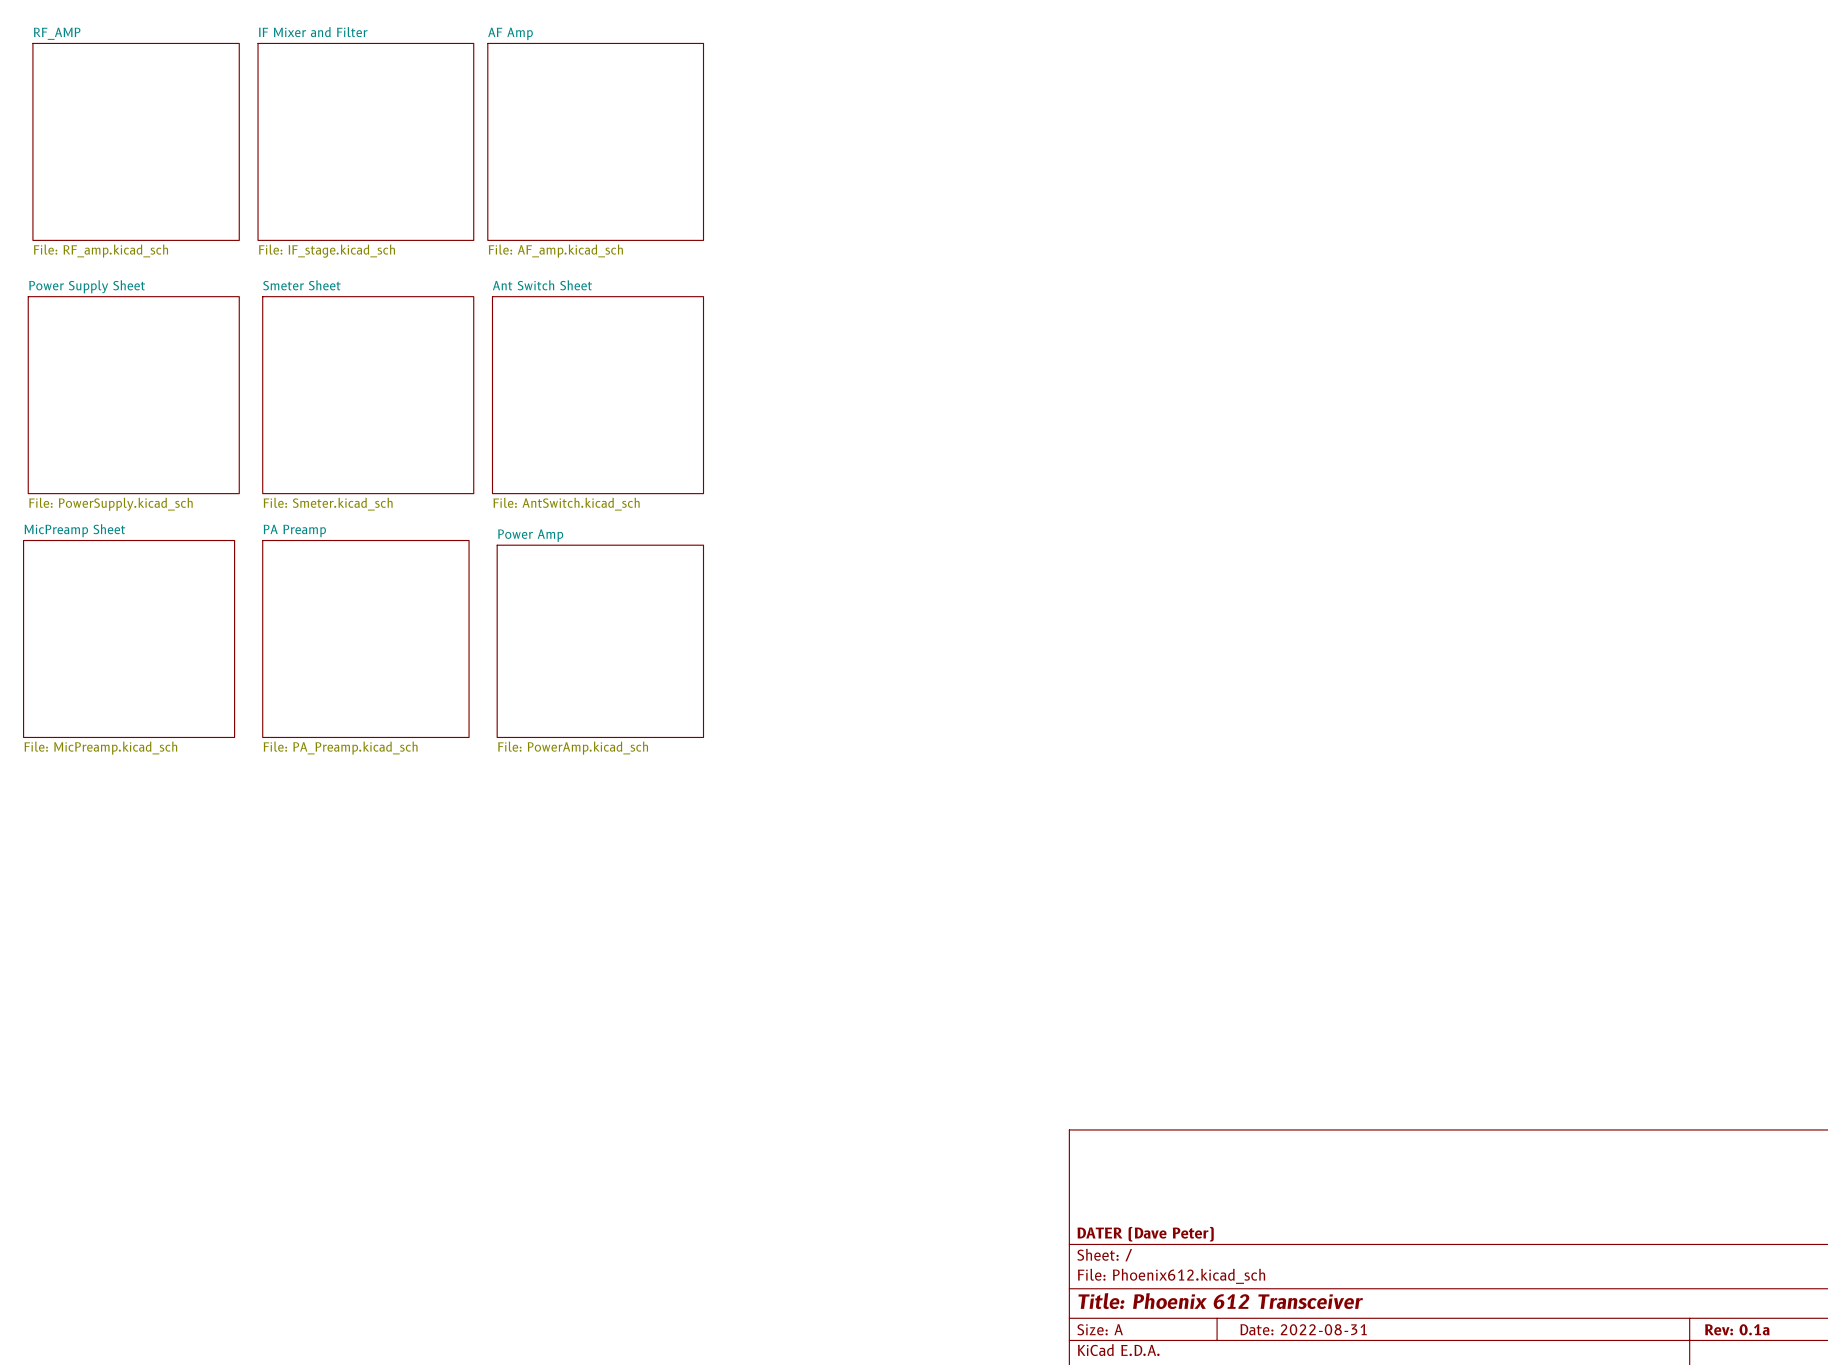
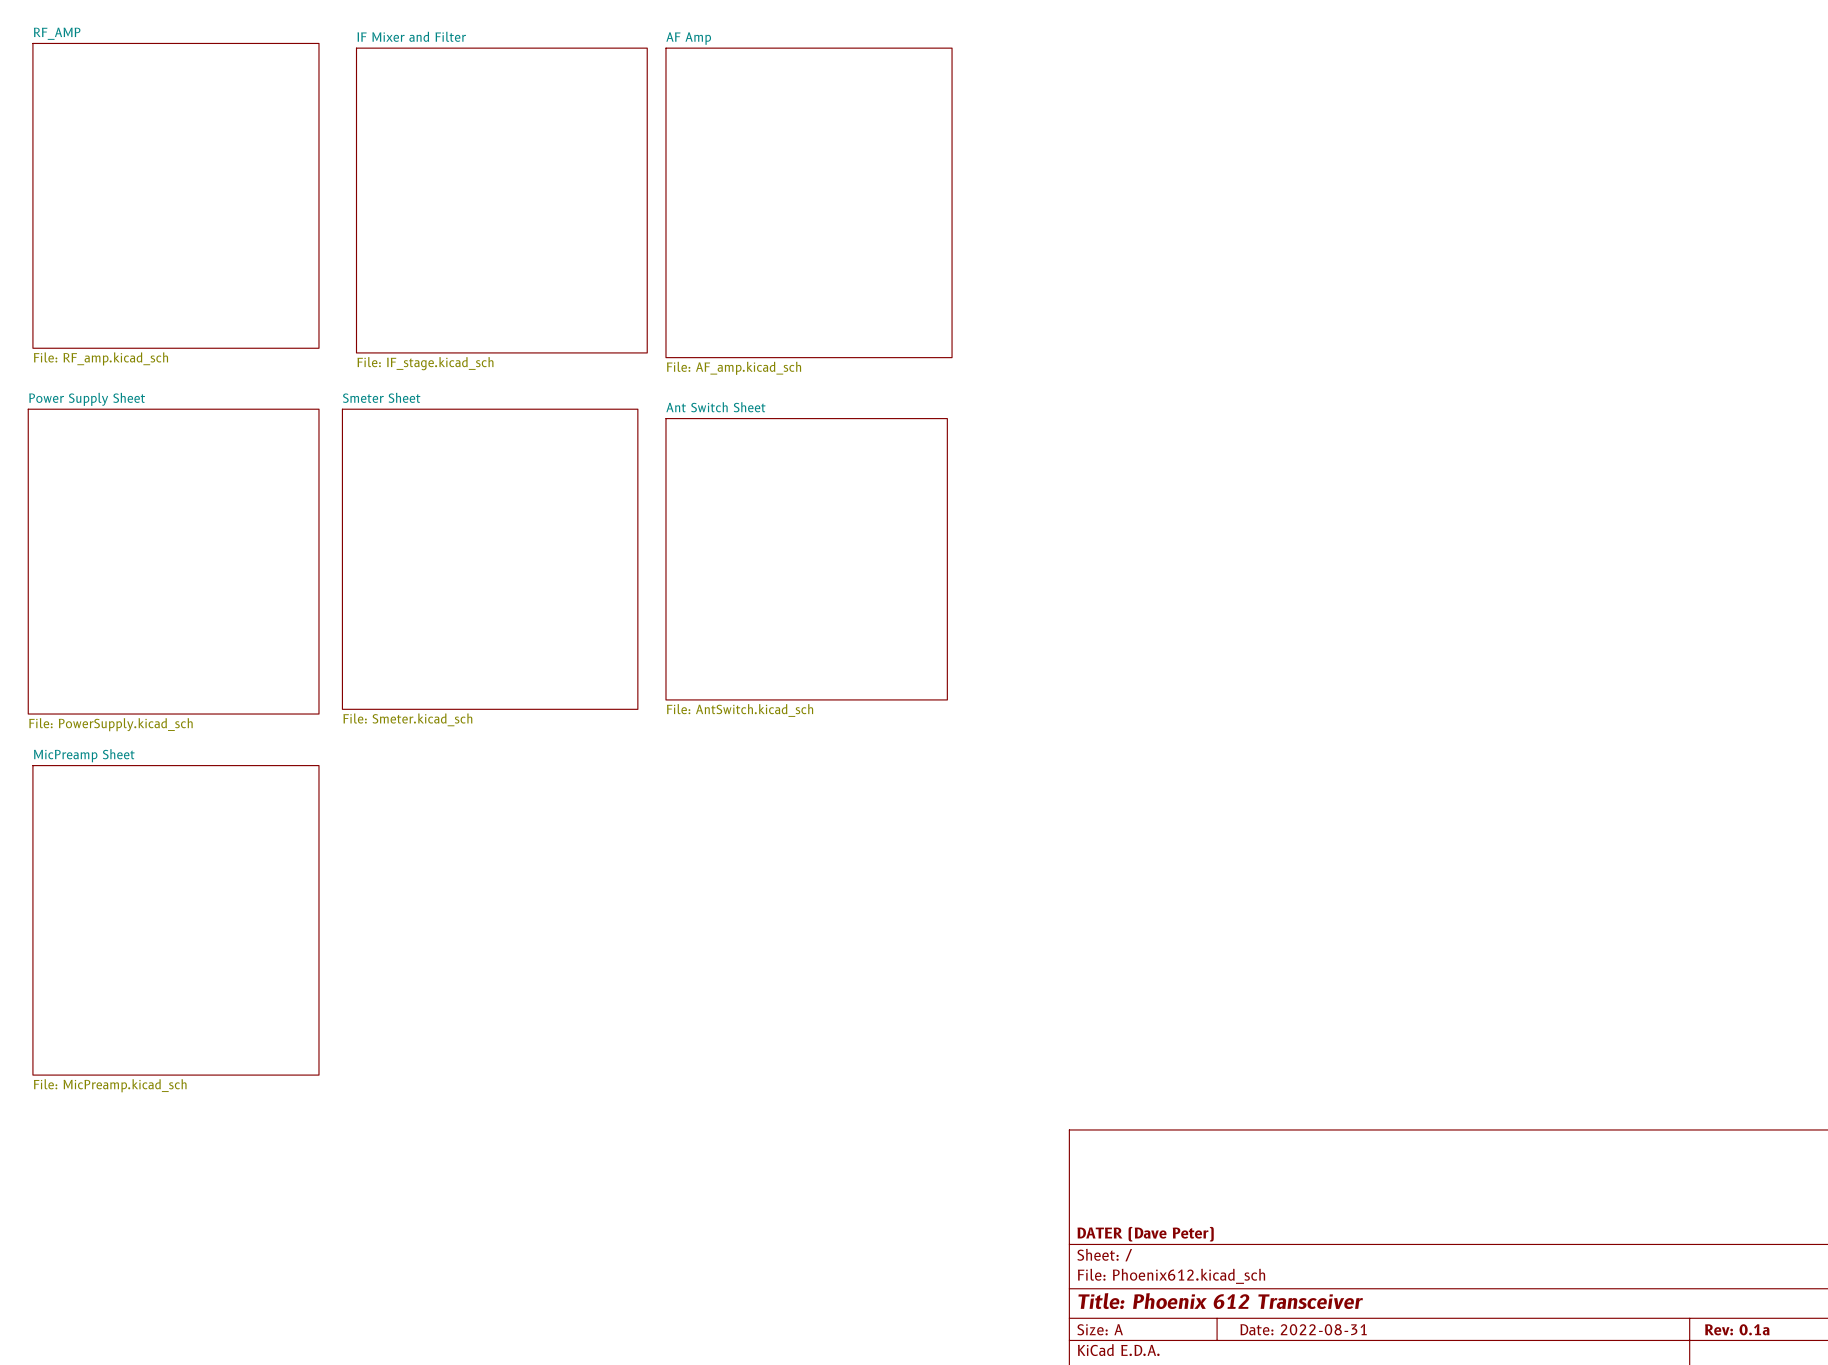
sheet RF_AMP: File: RF_amp.kicad_sch (136, 141) -> none
sheet IF Mixer and Filter: File: IF_stage.kicad_sch (365, 141) -> none
sheet AF Amp: File: AF_amp.kicad_sch (595, 141) -> none
sheet RF_AMP: none -> File: RF_amp.kicad_sch (175, 195)
sheet IF Mixer and Filter: none -> File: IF_stage.kicad_sch (501, 200)
sheet AF Amp: none -> File: AF_amp.kicad_sch (809, 202)
sheet Power Supply Sheet: File: PowerSupply.kicad_sch (133, 395) -> none
sheet Smeter Sheet: File: Smeter.kicad_sch (368, 395) -> none
sheet Ant Switch Sheet: File: AntSwitch.kicad_sch (597, 395) -> none
sheet Smeter Sheet: none -> File: Smeter.kicad_sch (490, 559)
sheet Ant Switch Sheet: none -> File: AntSwitch.kicad_sch (806, 559)
sheet Power Supply Sheet: none -> File: PowerSupply.kicad_sch (173, 561)
sheet MicPreamp Sheet: File: MicPreamp.kicad_sch (129, 638) -> none
sheet PA Preamp: File: PA_Preamp.kicad_sch (365, 638) -> none
sheet Power Amp: File: PowerAmp.kicad_sch (600, 641) -> none
sheet MicPreamp Sheet: none -> File: MicPreamp.kicad_sch (175, 920)

